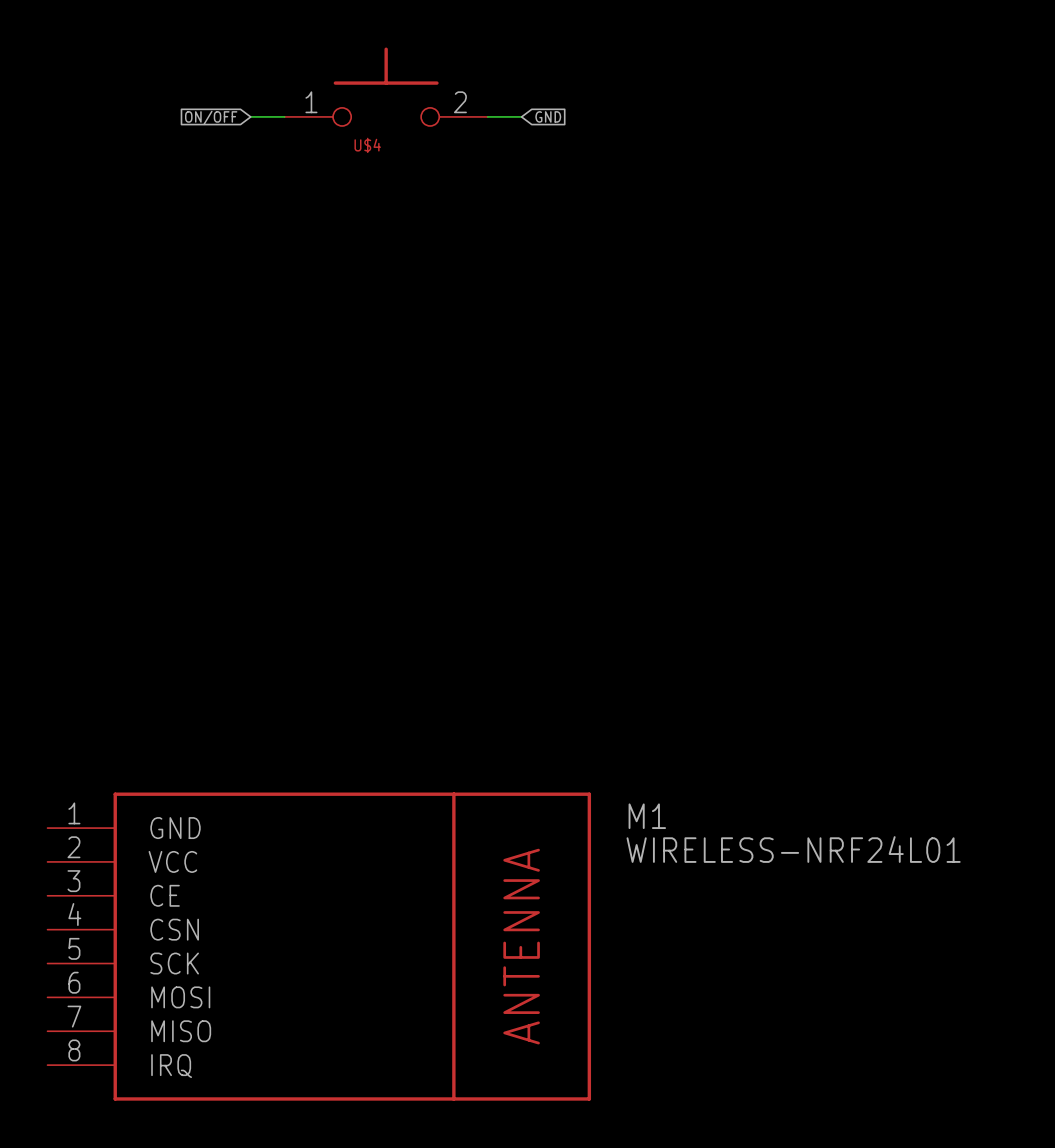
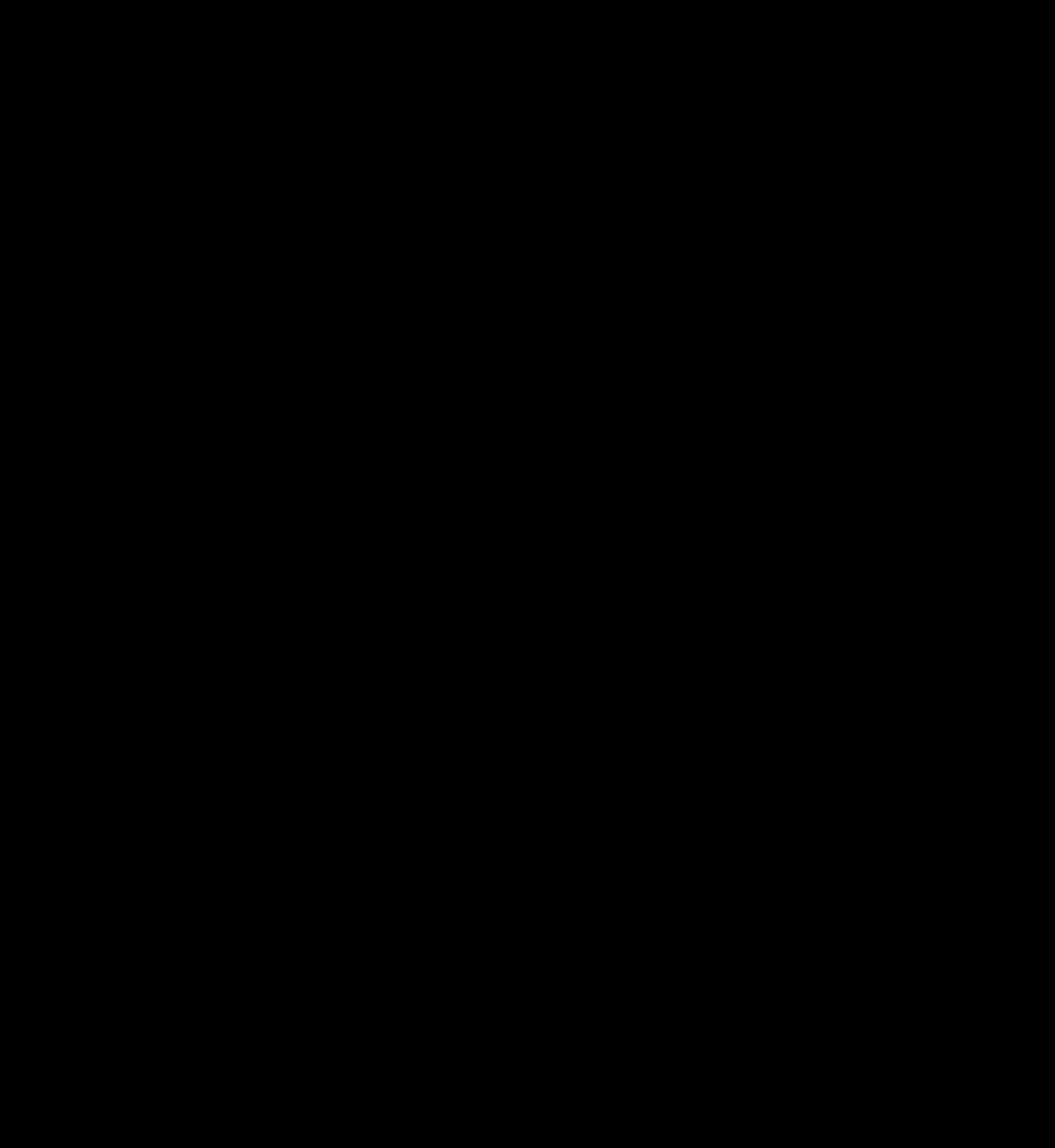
U$4: (386, 86) -> none
wire: (250, 116) (284, 116) -> none
wire: (487, 116) (521, 116) -> none
global label: GND (548, 116) -> none
global label: ON/OFF (211, 117) -> none
M1: WIRELESS-NRF24L01 (319, 946) -> none

